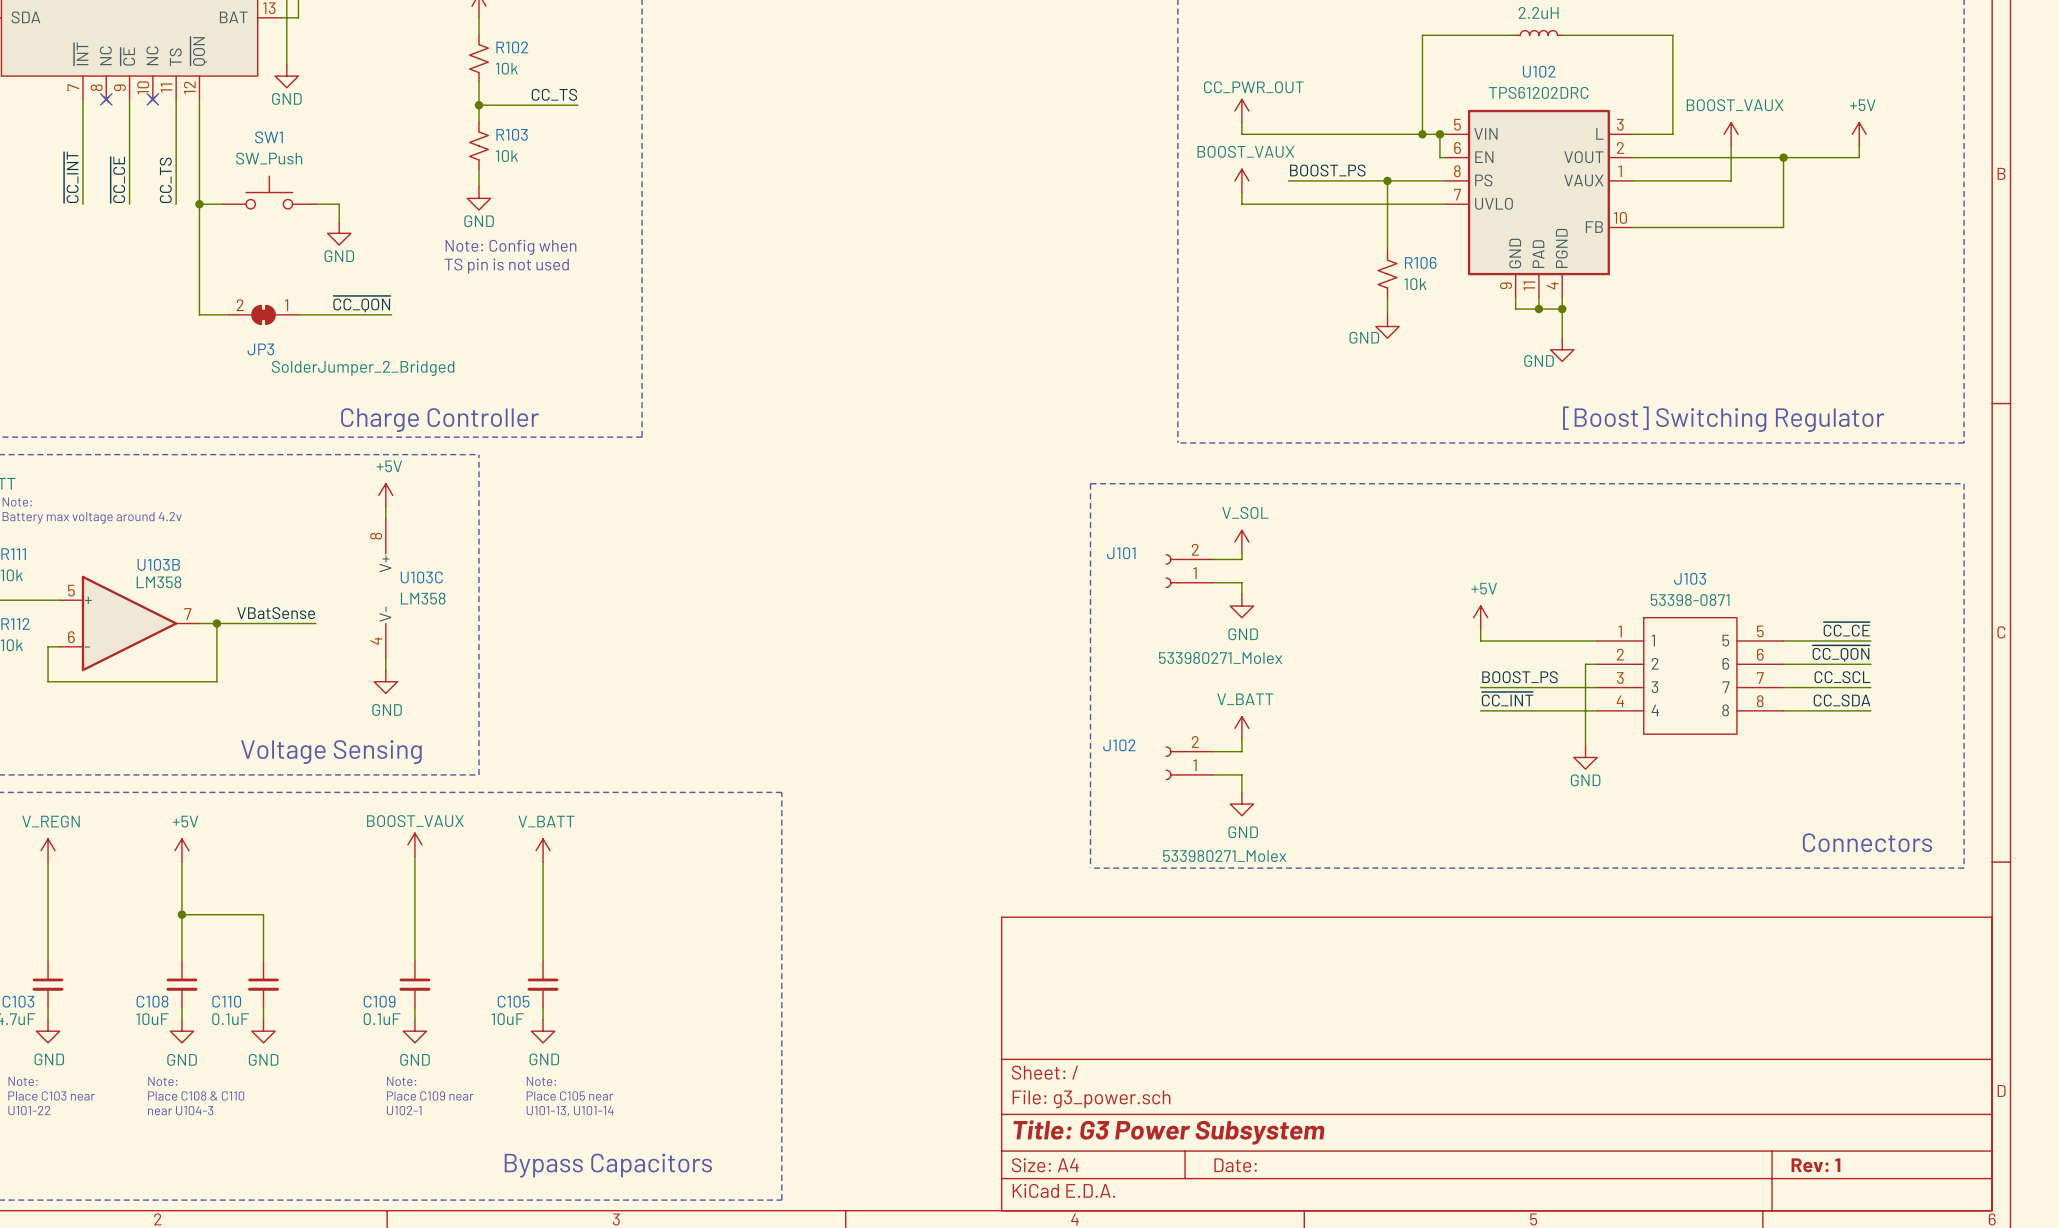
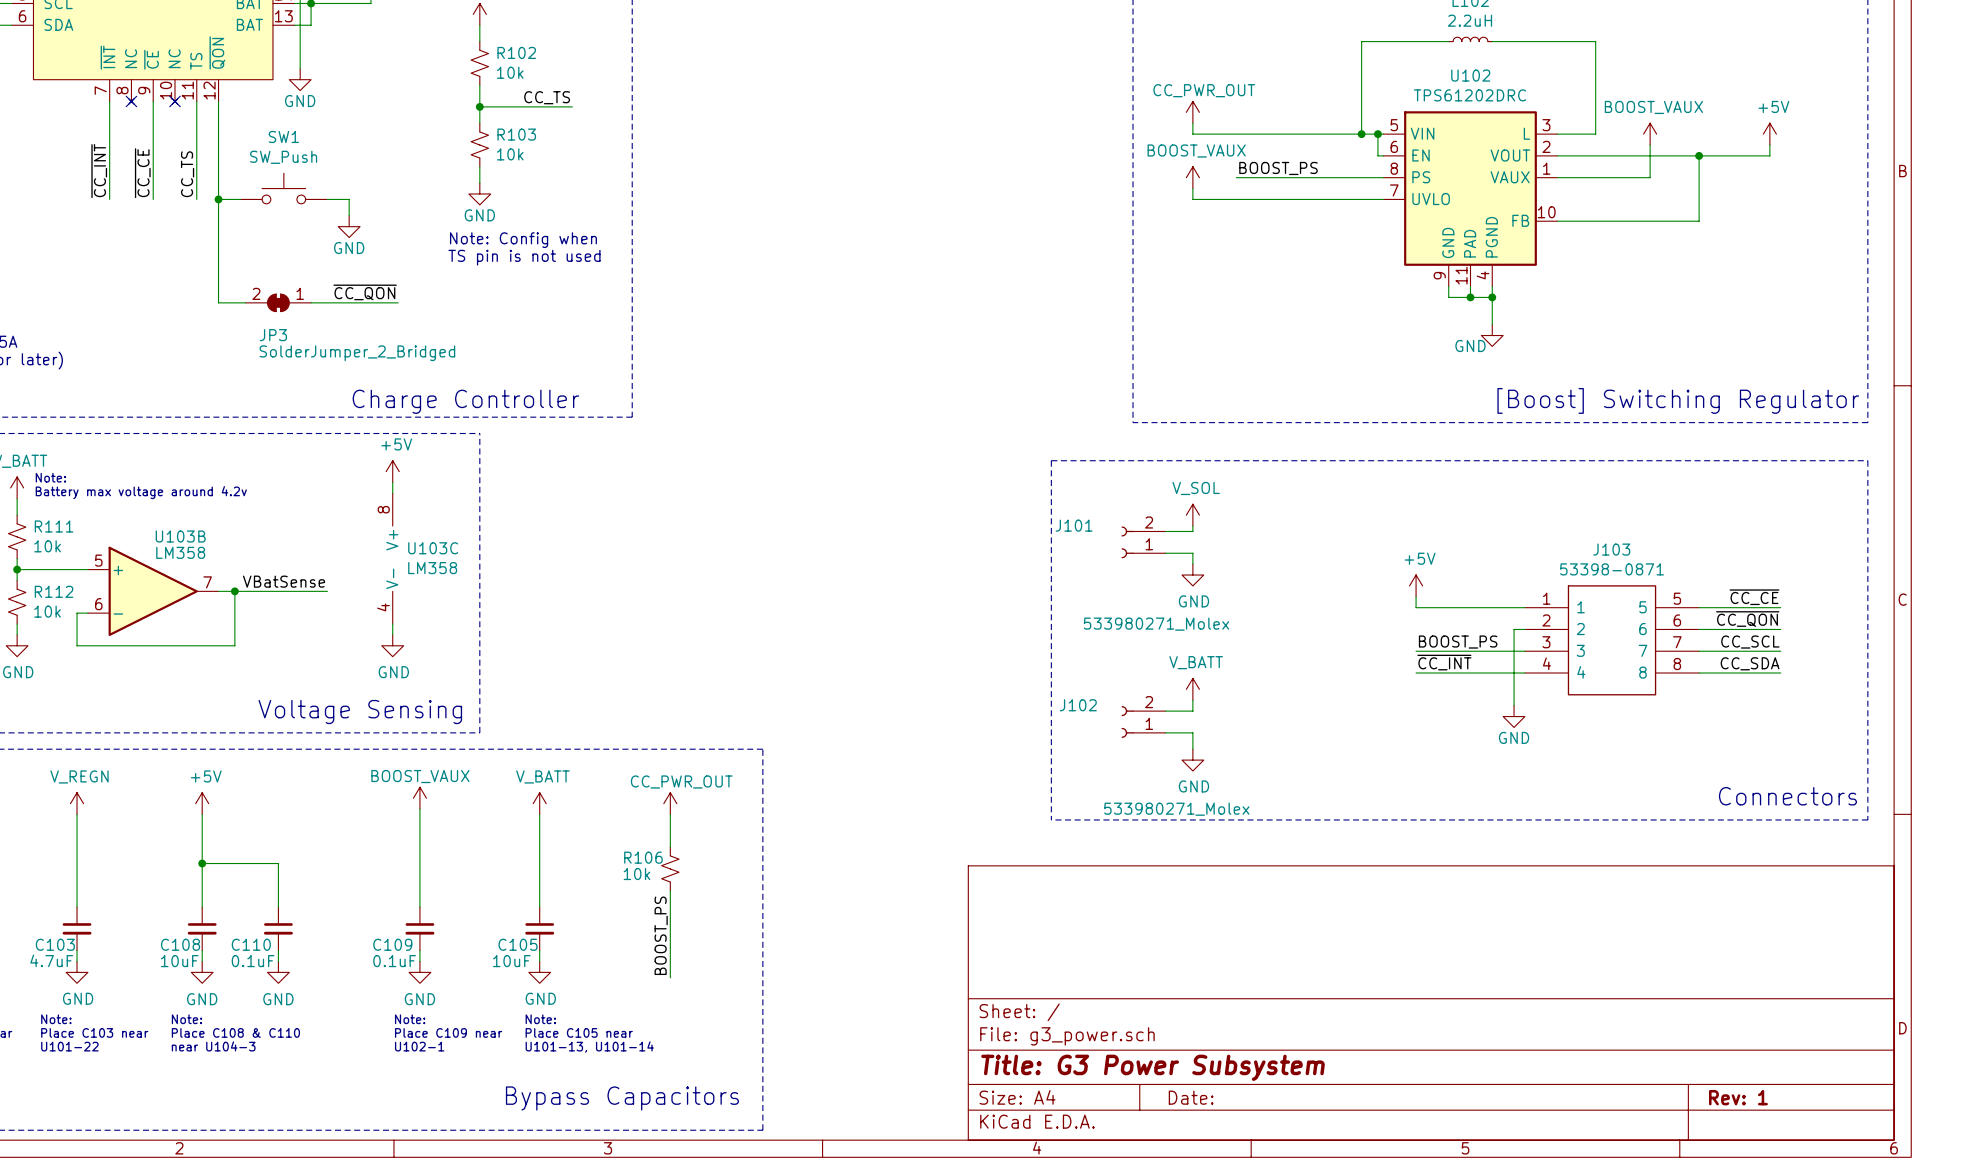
wire: (1387, 180) (1387, 250) -> none
junction: (1387, 180) -> none
R106 name position: R106 (1420, 262) -> R106 (643, 857)
R106 position: (1387, 274) -> (670, 868)
R106 value position: 10k (1415, 284) -> 10k (636, 874)
wire: (1387, 297) (1387, 314) -> none
power symbol: GND (1387, 326) -> none
power symbol: none -> CC_PWR_OUT (670, 803)
wire: none -> (670, 814) (670, 847)
wire: none -> (670, 890) (670, 977)
label: none -> BOOST_PS (661, 935)

